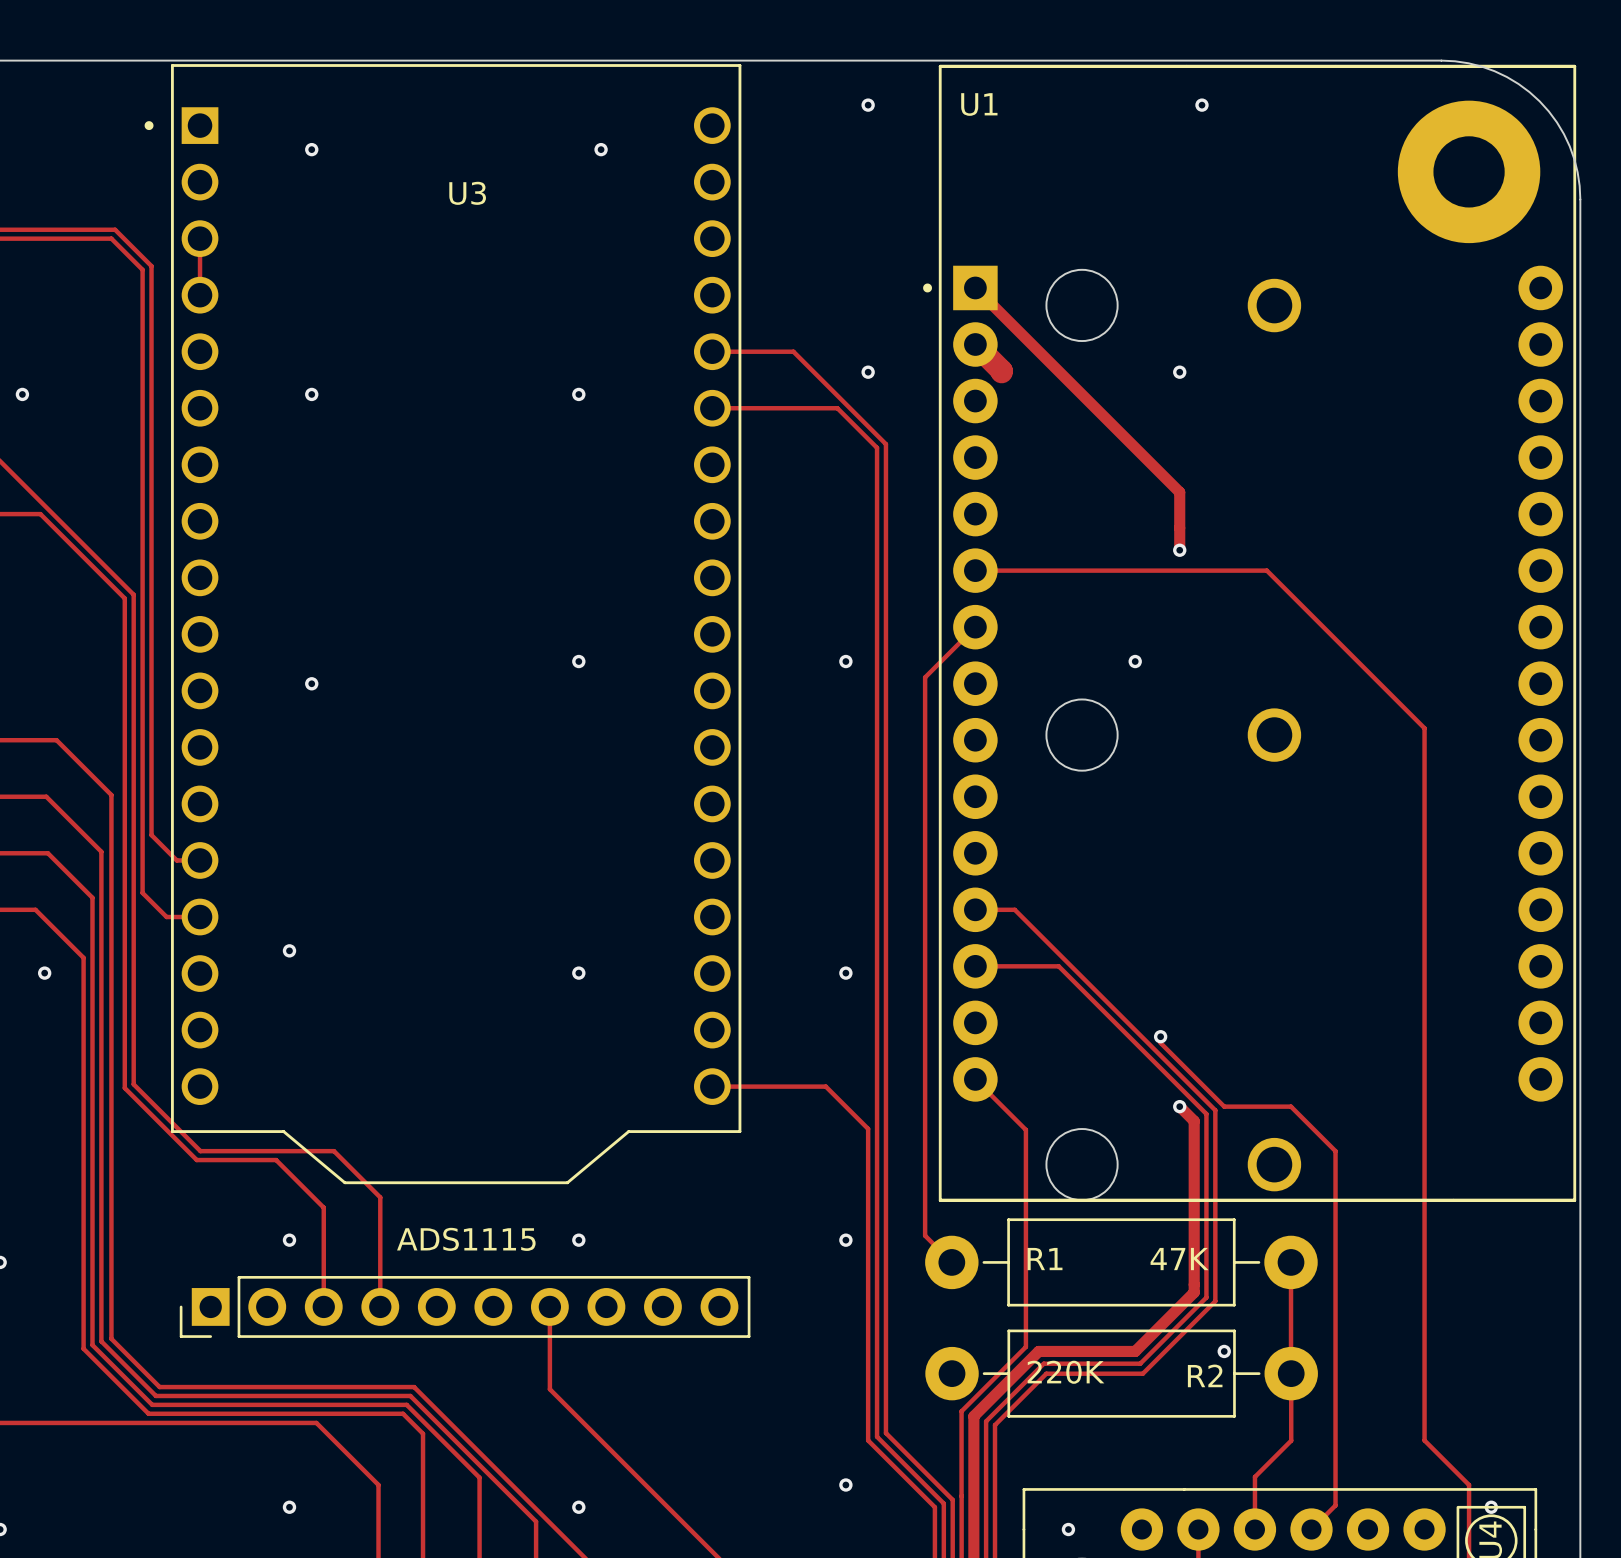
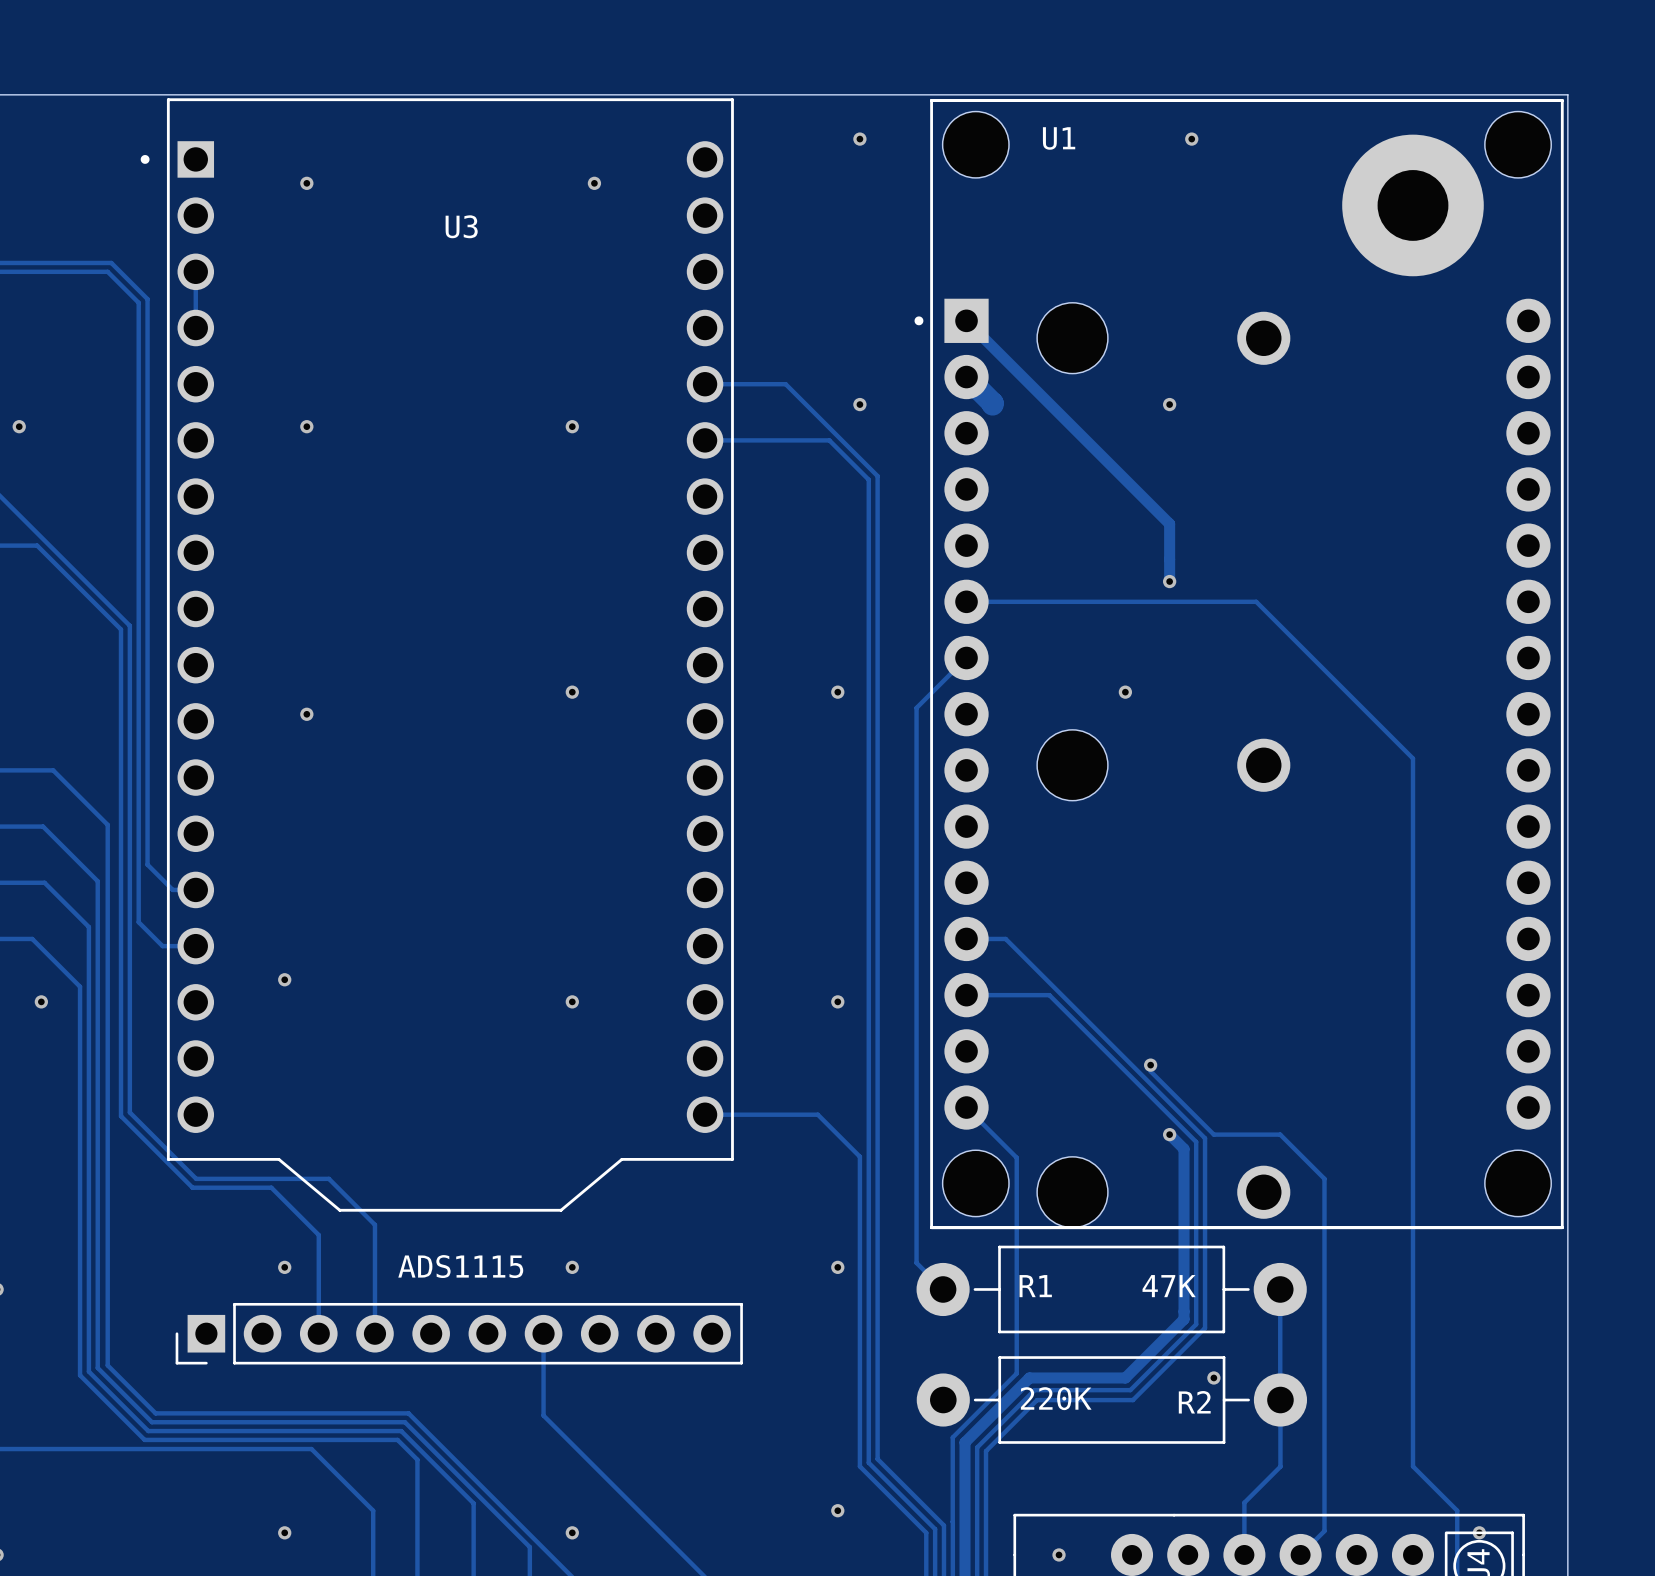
board edge: (1441, 60) (1468, 63) (1494, 71) (1518, 84) (1539, 101) (1556, 122) (1569, 146) (1577, 172) (1580, 199) -> (1429, 94) (1567, 94) (1567, 232)
U1 footprint: [923, 64, 1577, 1202] -> [914, 99, 1564, 1230]
U1 name position: U1 (979, 104) -> U1 (1059, 138)
part position: (1469, 171) -> (1412, 205)

